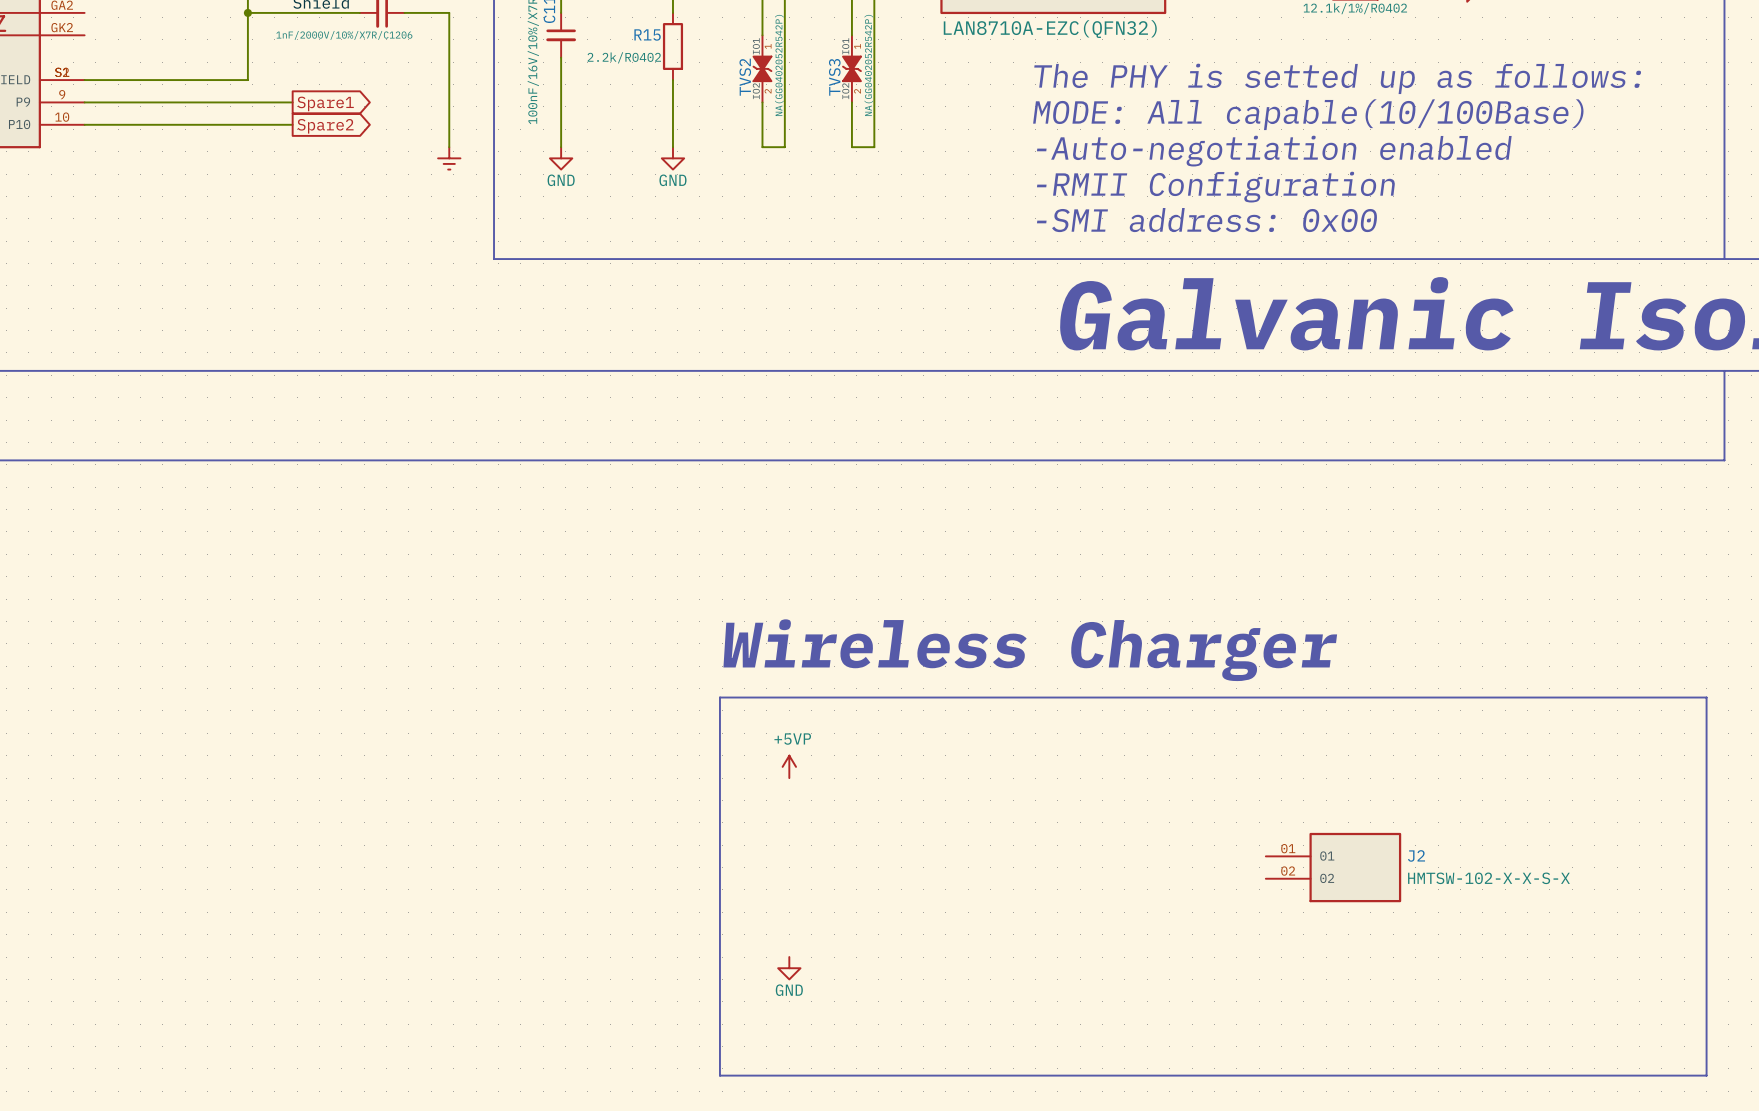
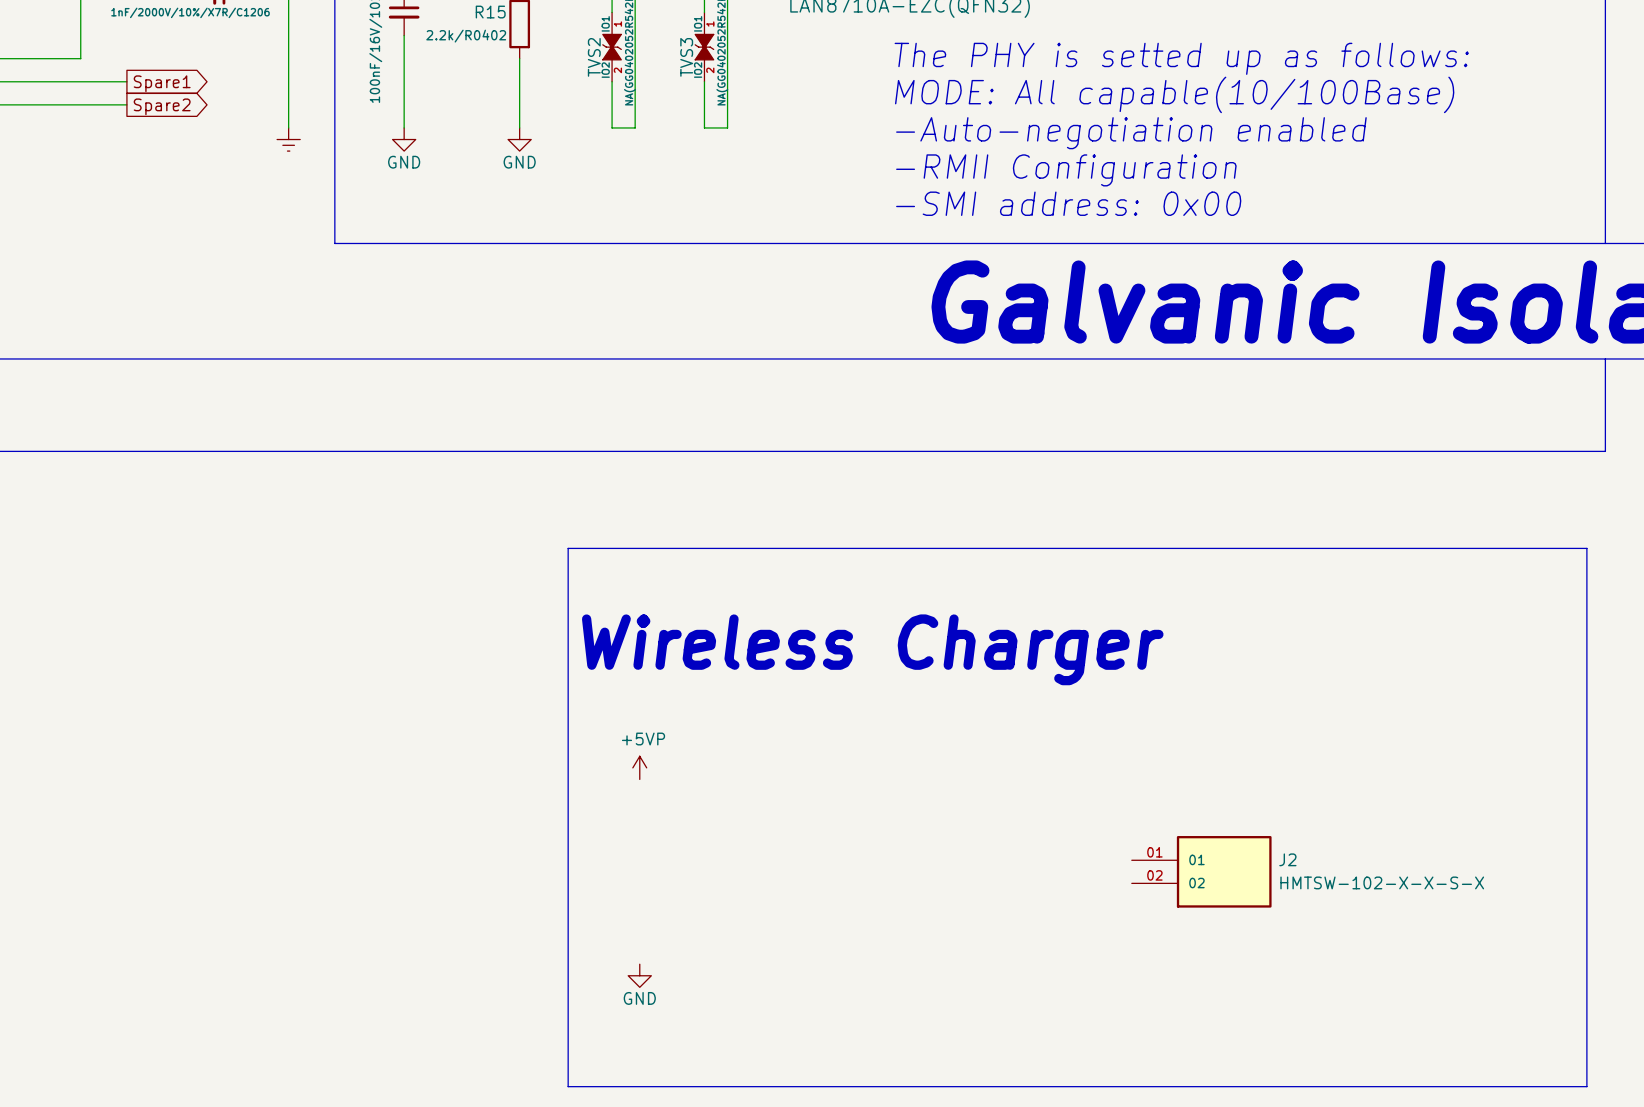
line: (719, 697) (1706, 697) -> (568, 696) (568, 548) (1586, 548) (1586, 696)

